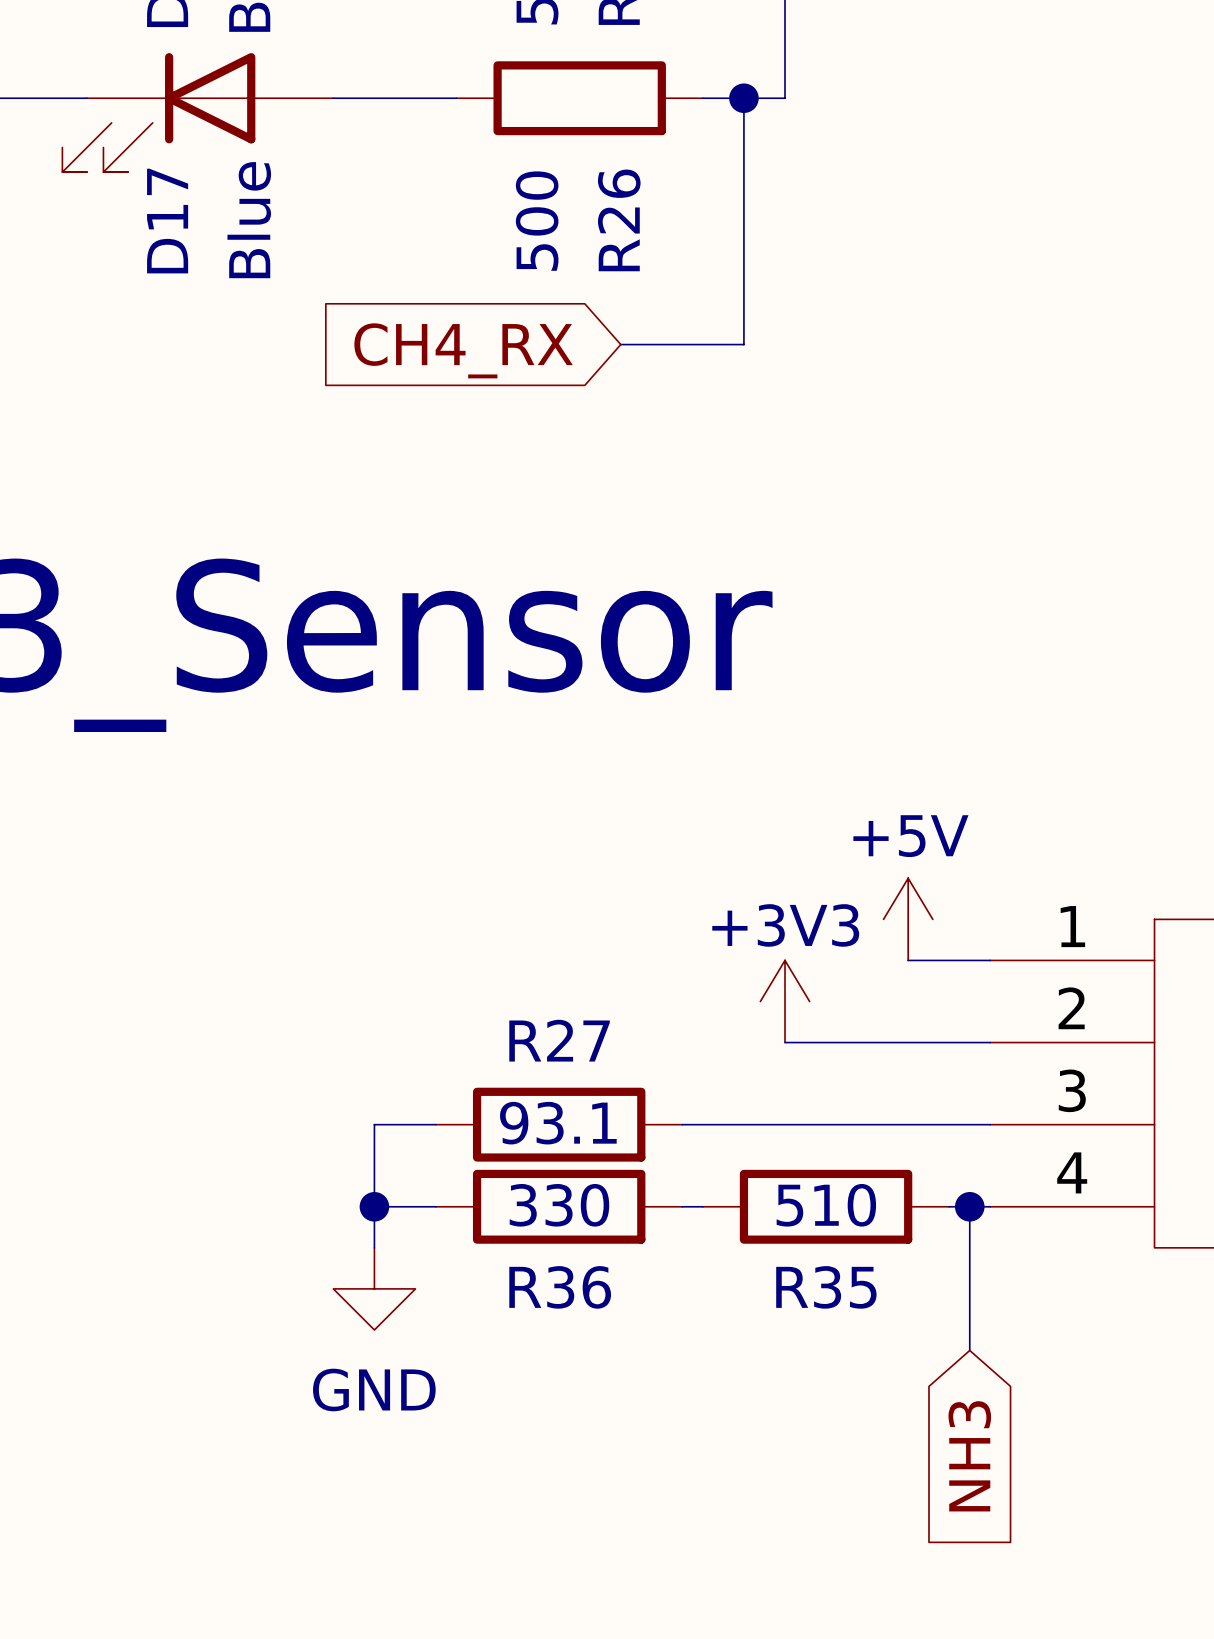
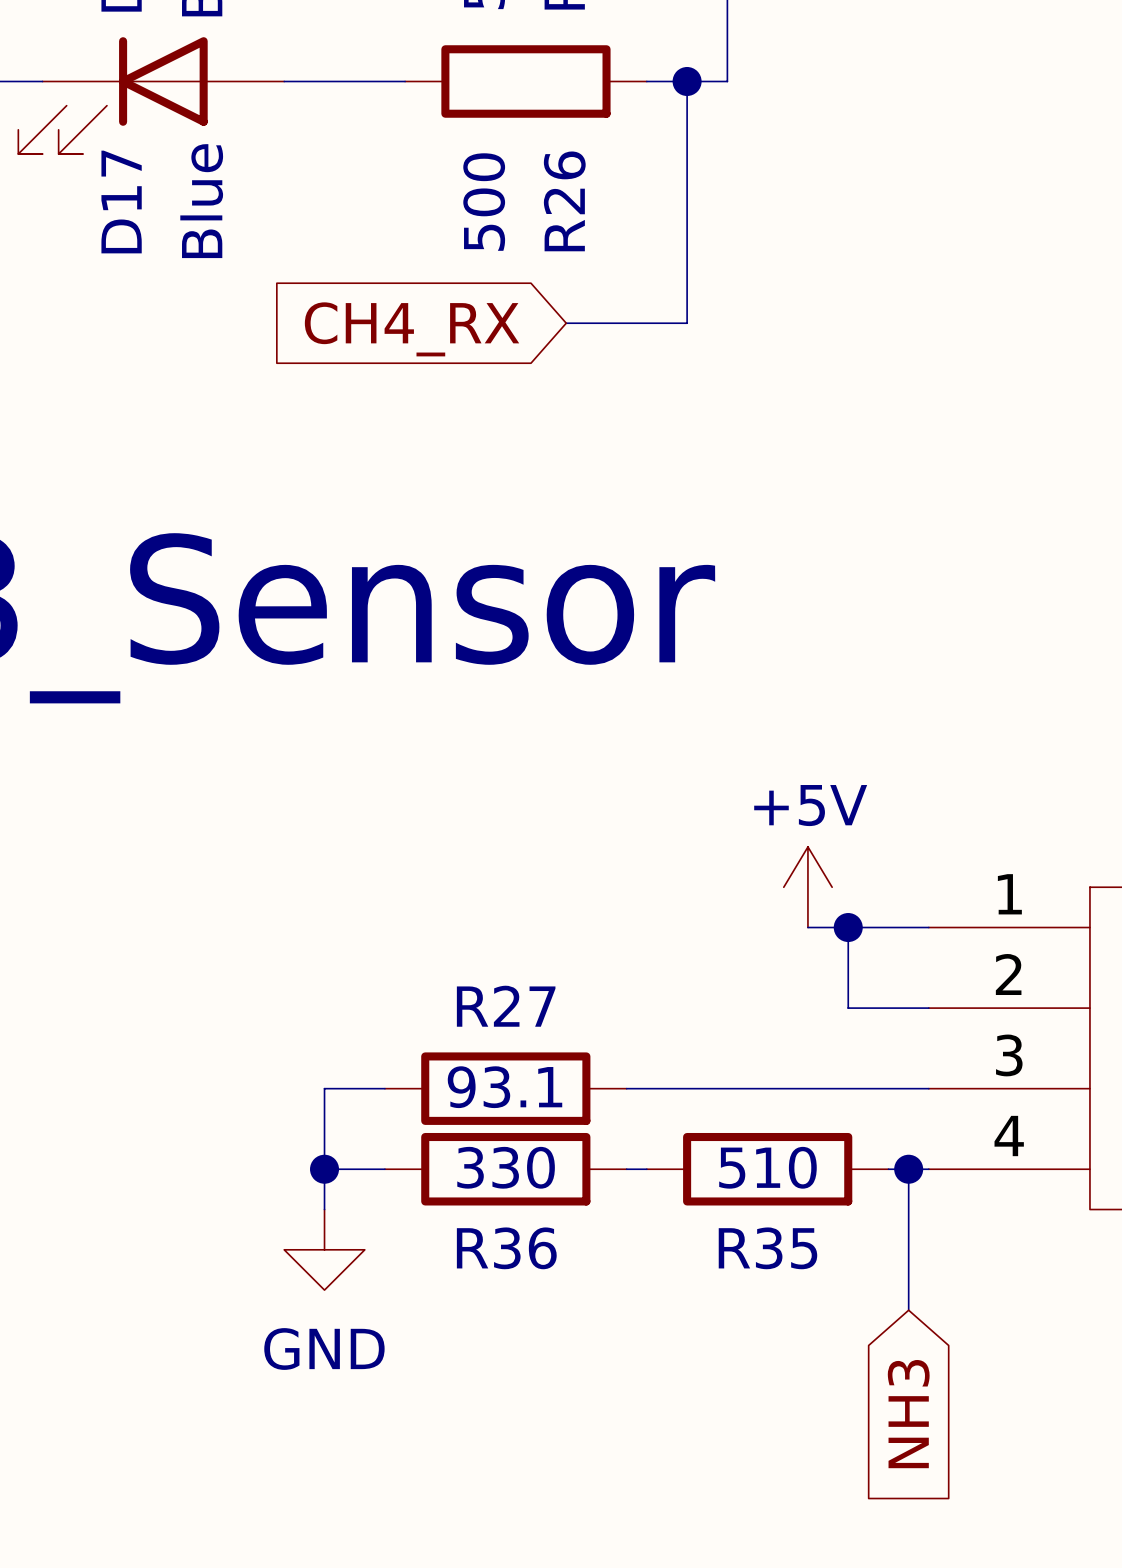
power symbol position: +5V (908, 919) -> +5V (807, 887)
junction: none -> (848, 927)
power symbol: +3V3 (785, 1001) -> none
wire: (785, 1042) (908, 1042) -> (807, 927) (848, 927) (848, 1008)

